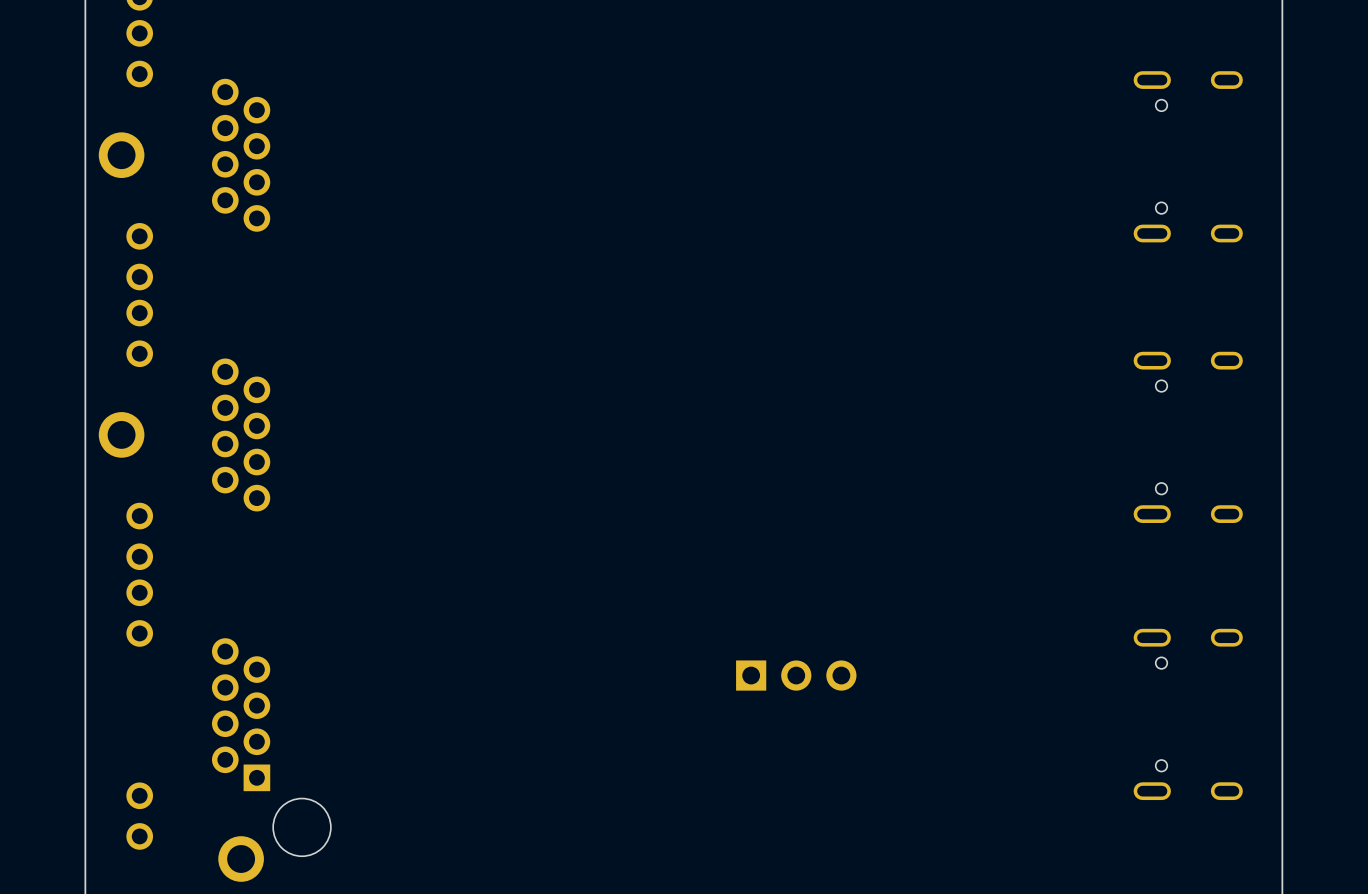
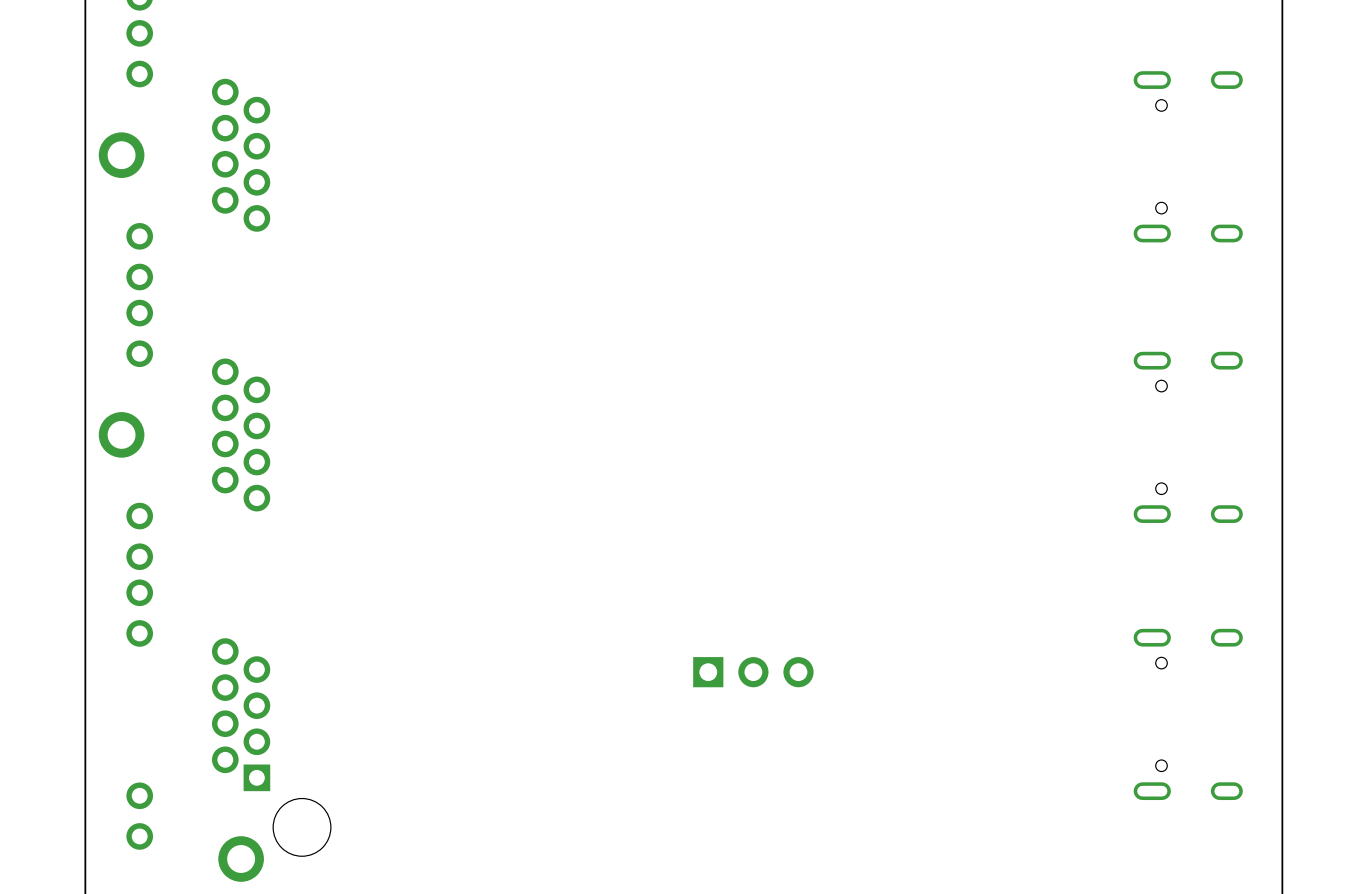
part position: (796, 675) -> (753, 672)

